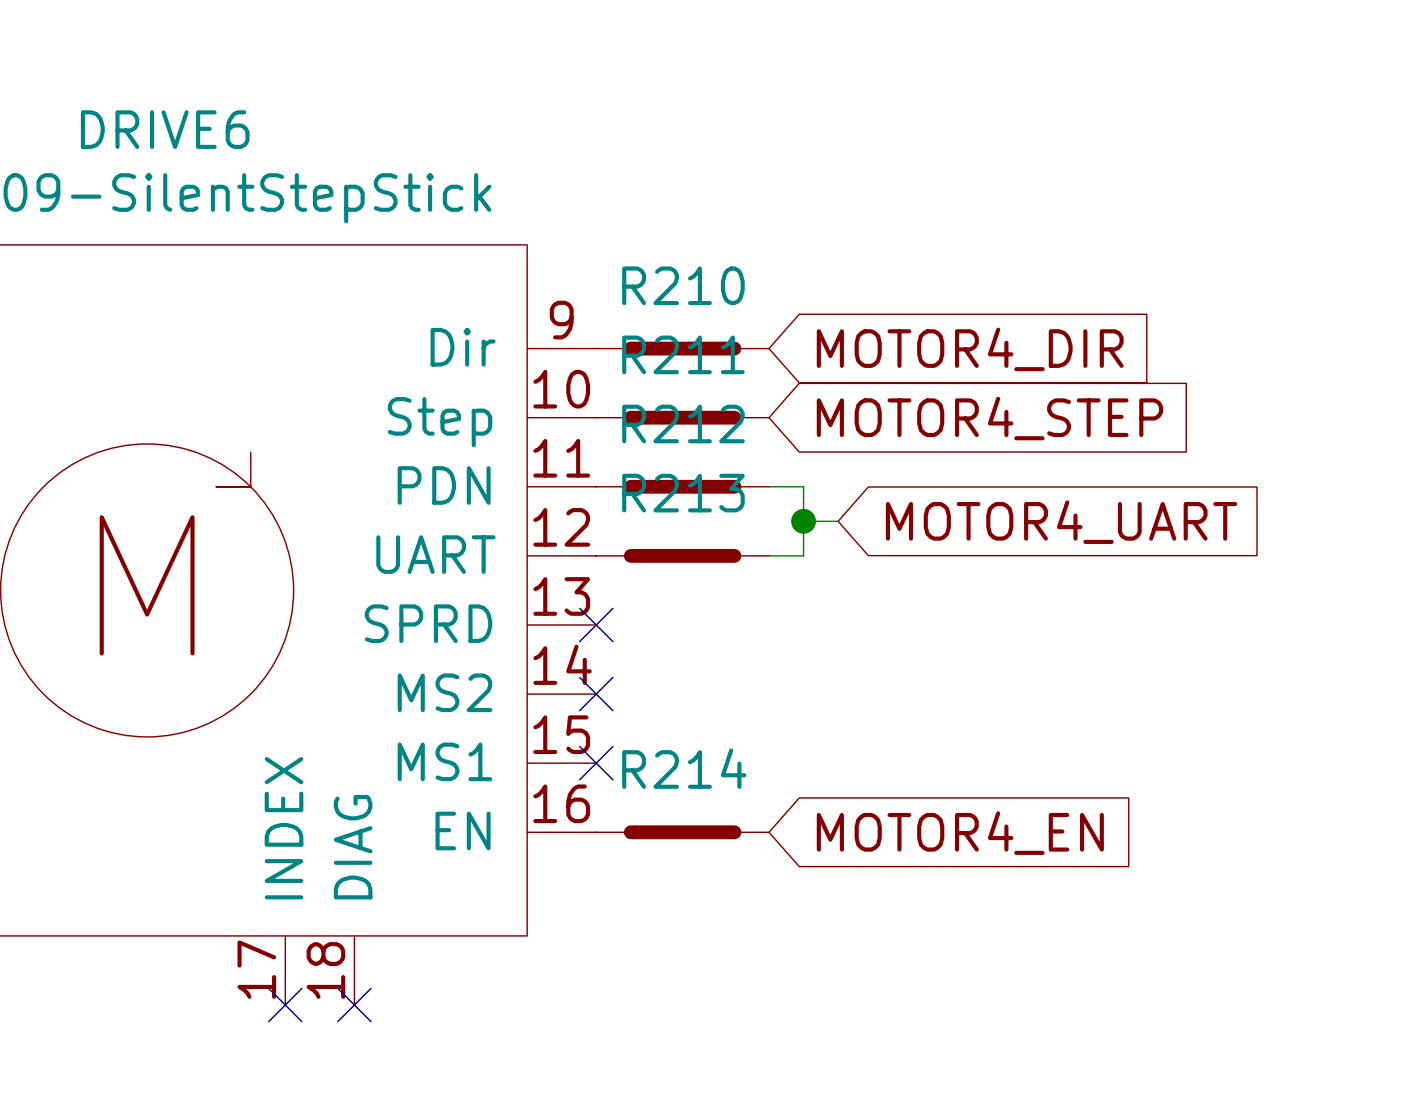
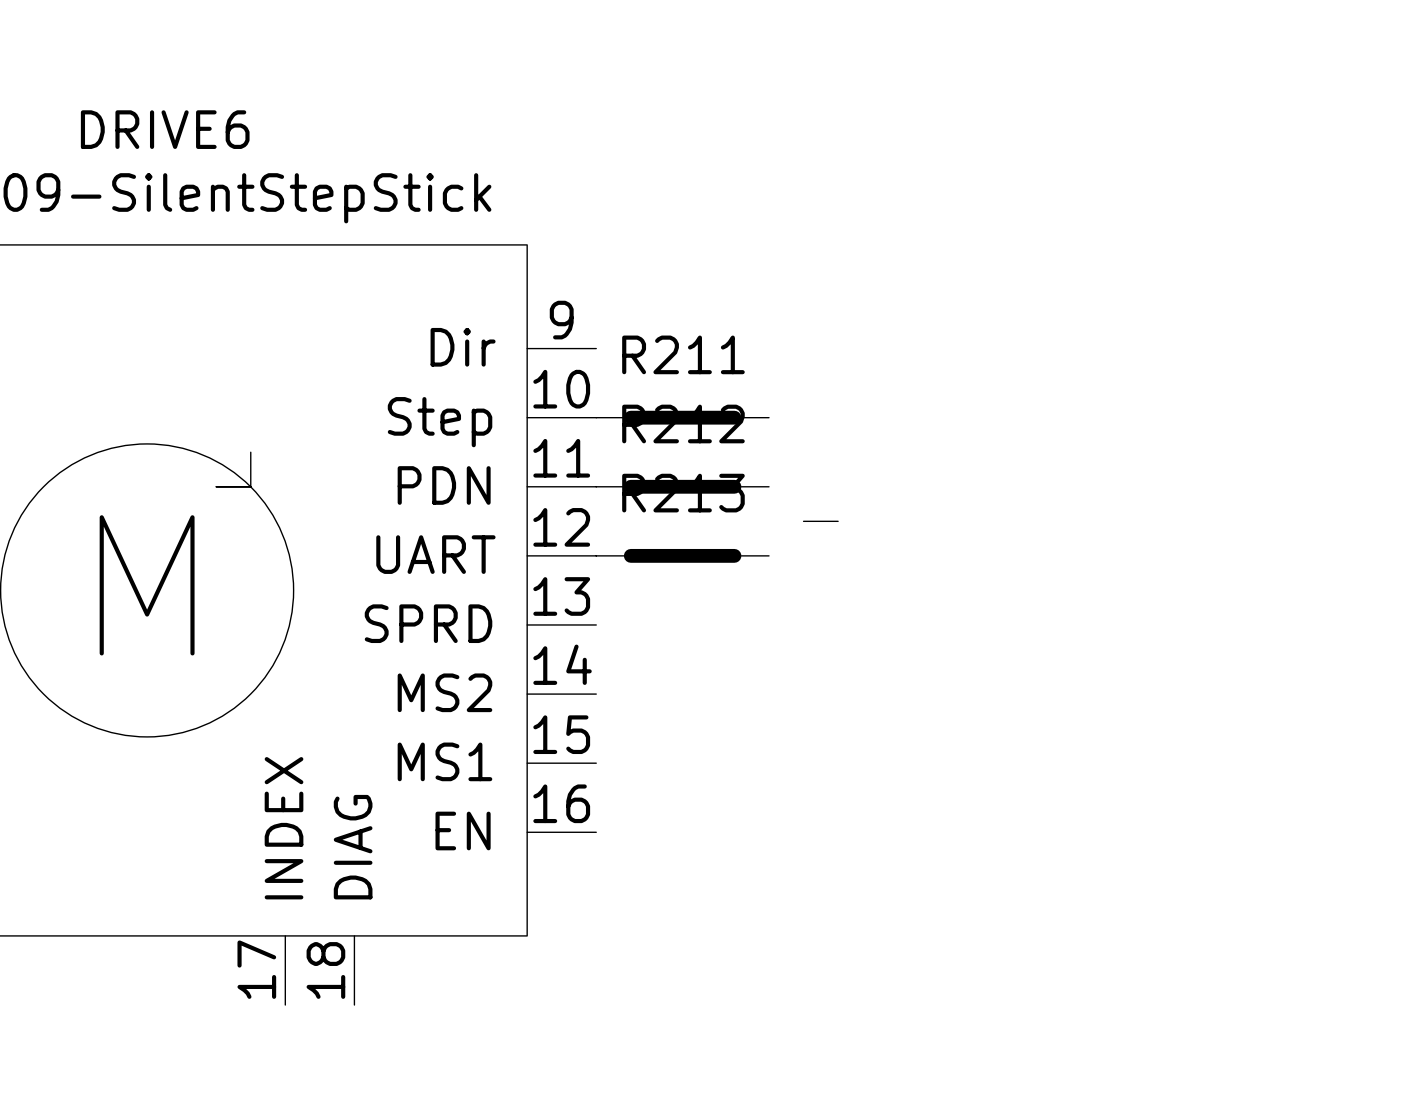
R210: (682, 348) -> none
global label: MOTOR4_DIR (970, 349) -> none
global label: MOTOR4_STEP (989, 418) -> none
wire: (769, 486) (803, 486) (803, 555) (769, 555) -> none
junction: (803, 521) -> none
global label: MOTOR4_UART (1061, 522) -> none
no-connect mark: (596, 624) -> none
no-connect mark: (596, 694) -> none
no-connect mark: (596, 763) -> none
R214: (682, 832) -> none
global label: MOTOR4_EN (960, 833) -> none
no-connect mark: (285, 1005) -> none
no-connect mark: (354, 1005) -> none

